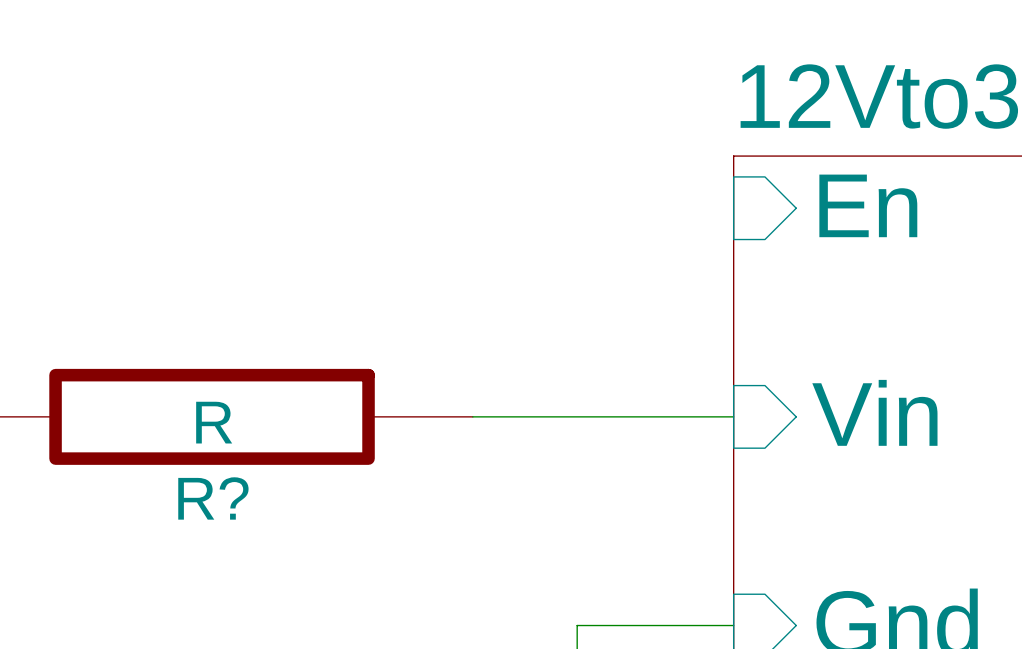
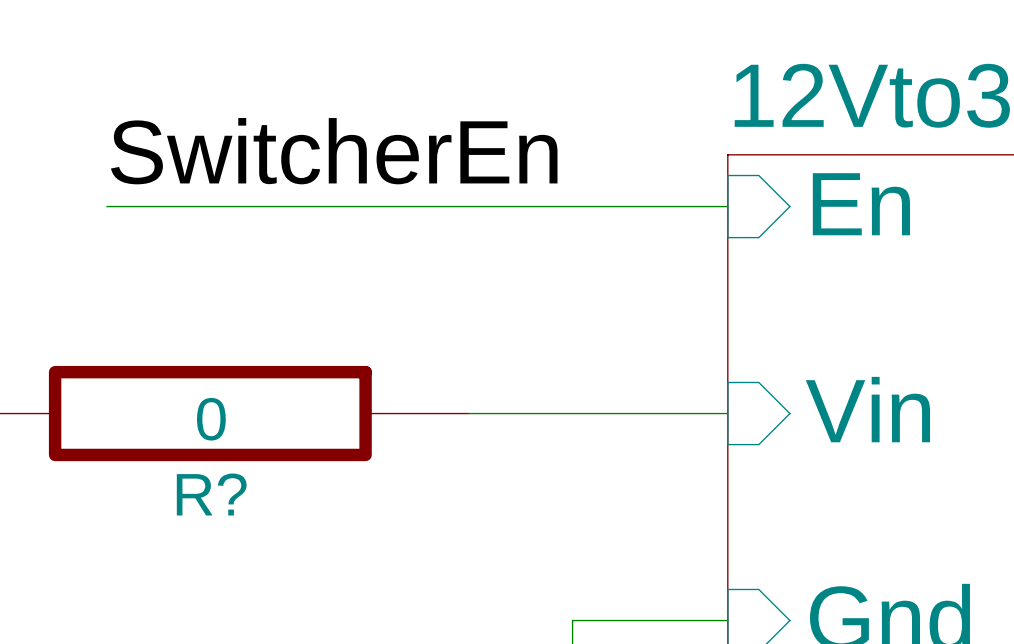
label: none -> SwitcherEn (334, 151)
wire: none -> (106, 206) (727, 206)
R? value: R (214, 422) -> 0 (211, 419)

